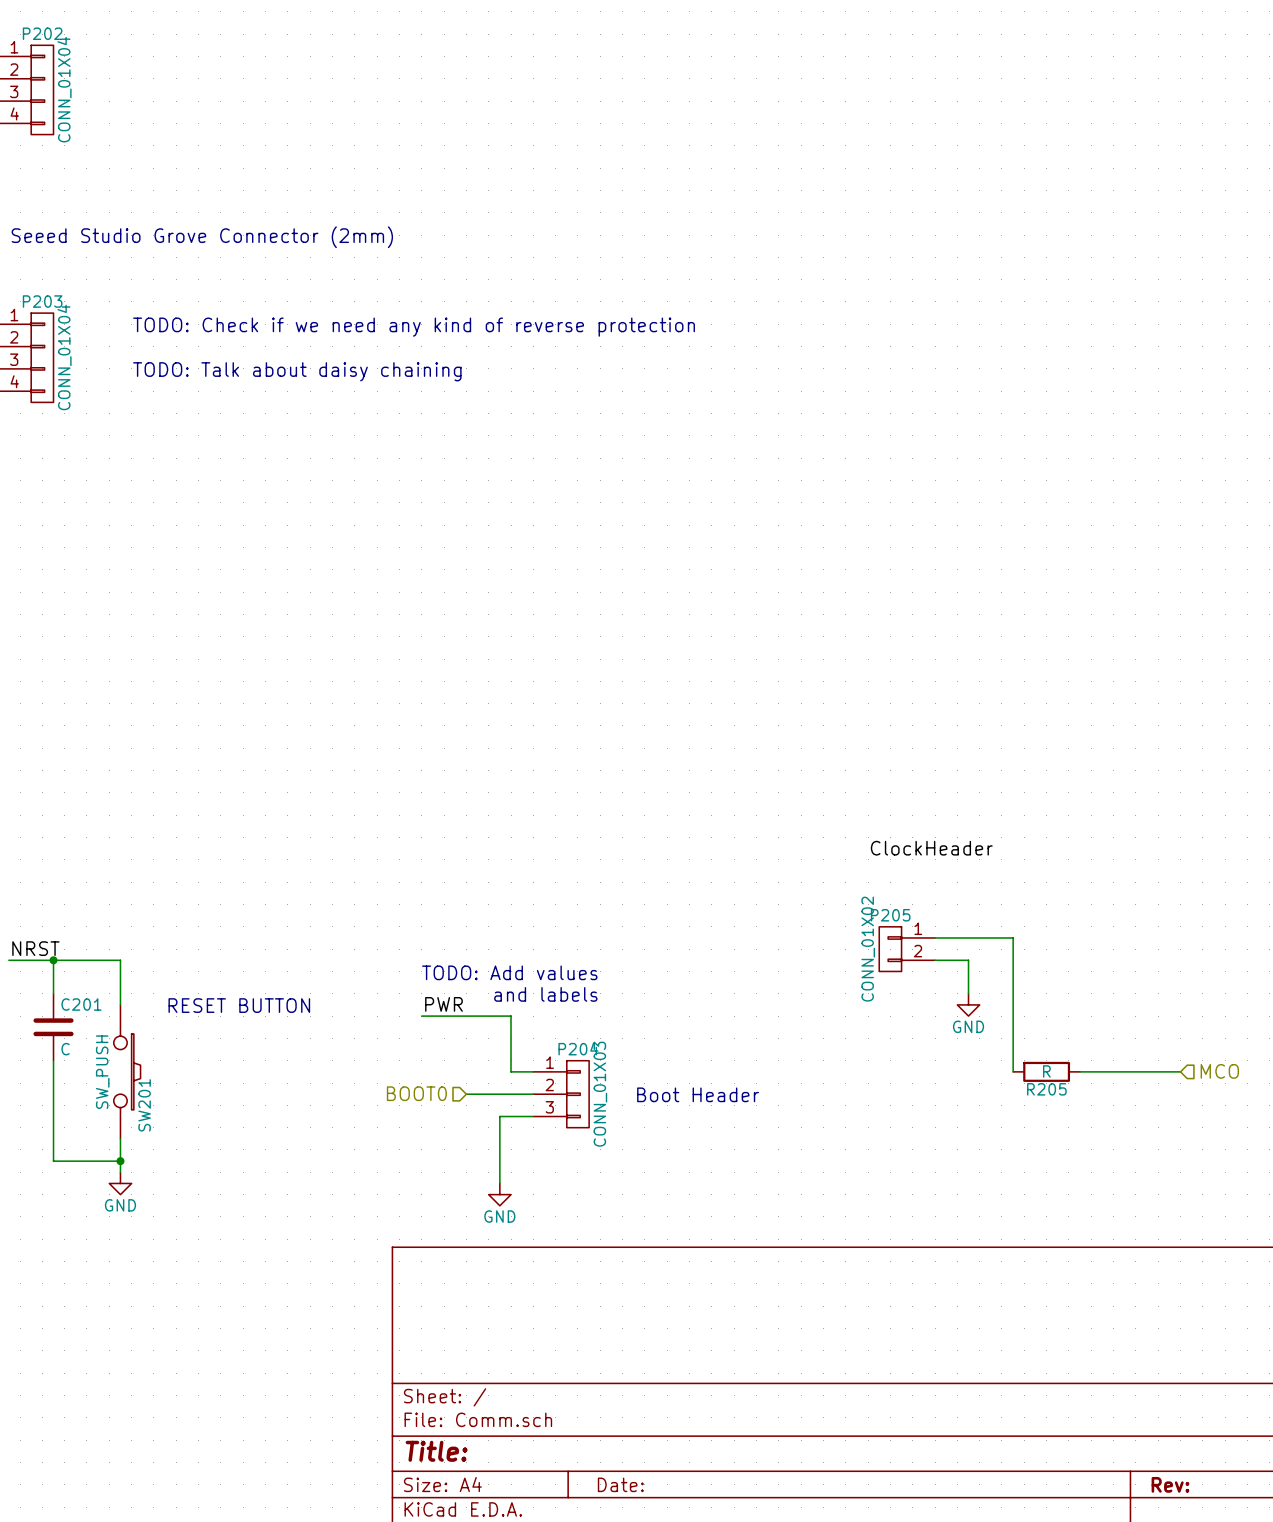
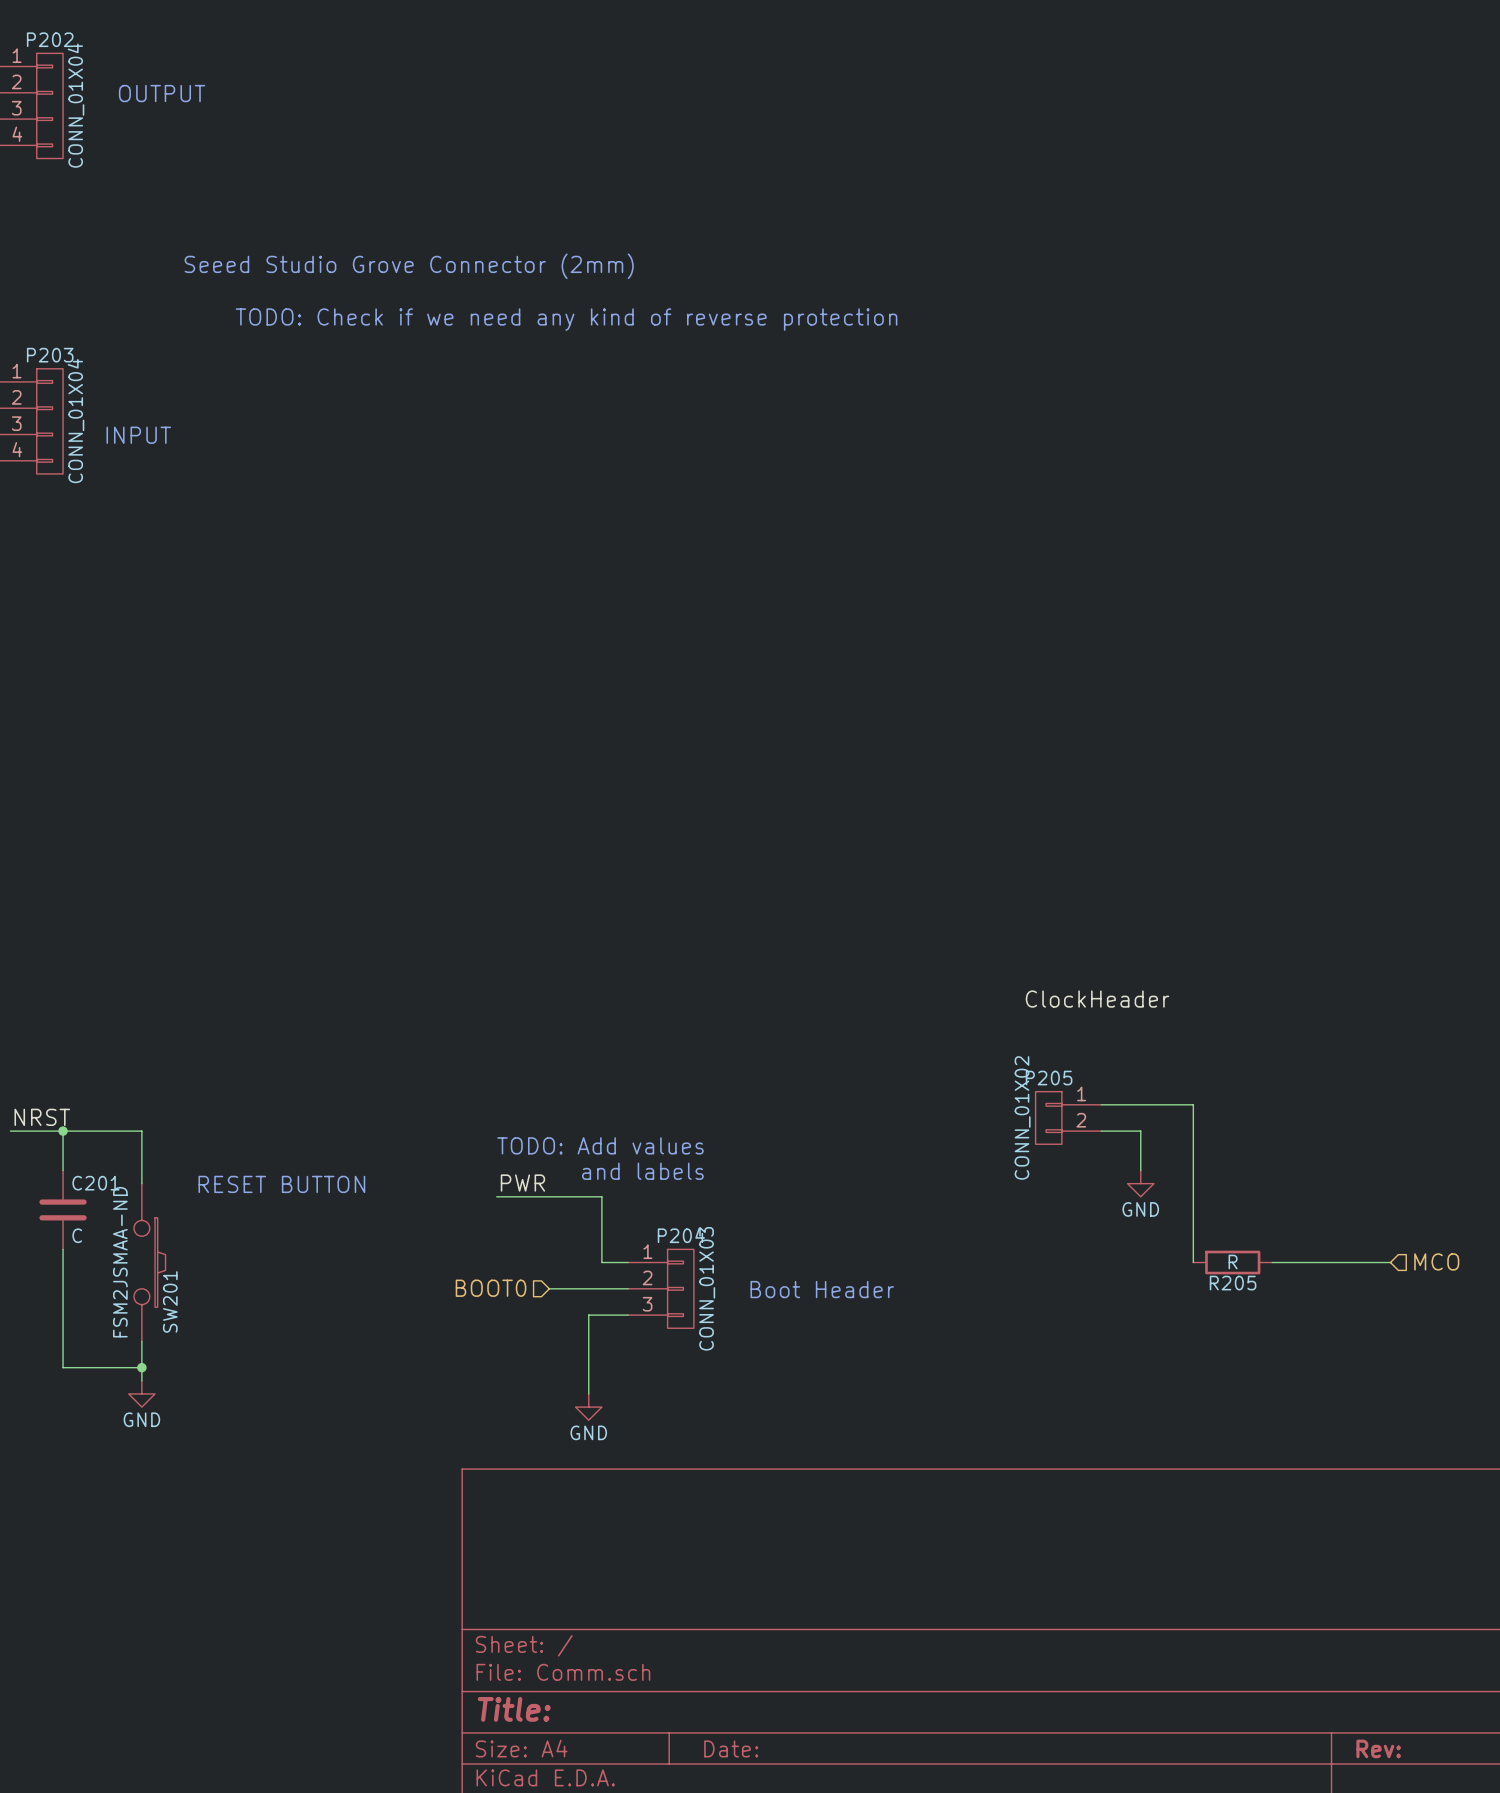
text: none -> OUTPUT (162, 93)
text position: Seeed Studio Grove Connector (2mm) (202, 237) -> Seeed Studio Grove Connector (2mm) (409, 266)
text position: TODO: Check if we need any kind of reverse protection (414, 327) -> TODO: Check if we need any kind of reverse protection (566, 319)
text: none -> INPUT (138, 435)
text: TODO: Talk about daisy chaining (297, 371) -> none
SW201 value: SW_PUSH (102, 1072) -> FSM2JSMAA-ND (120, 1262)

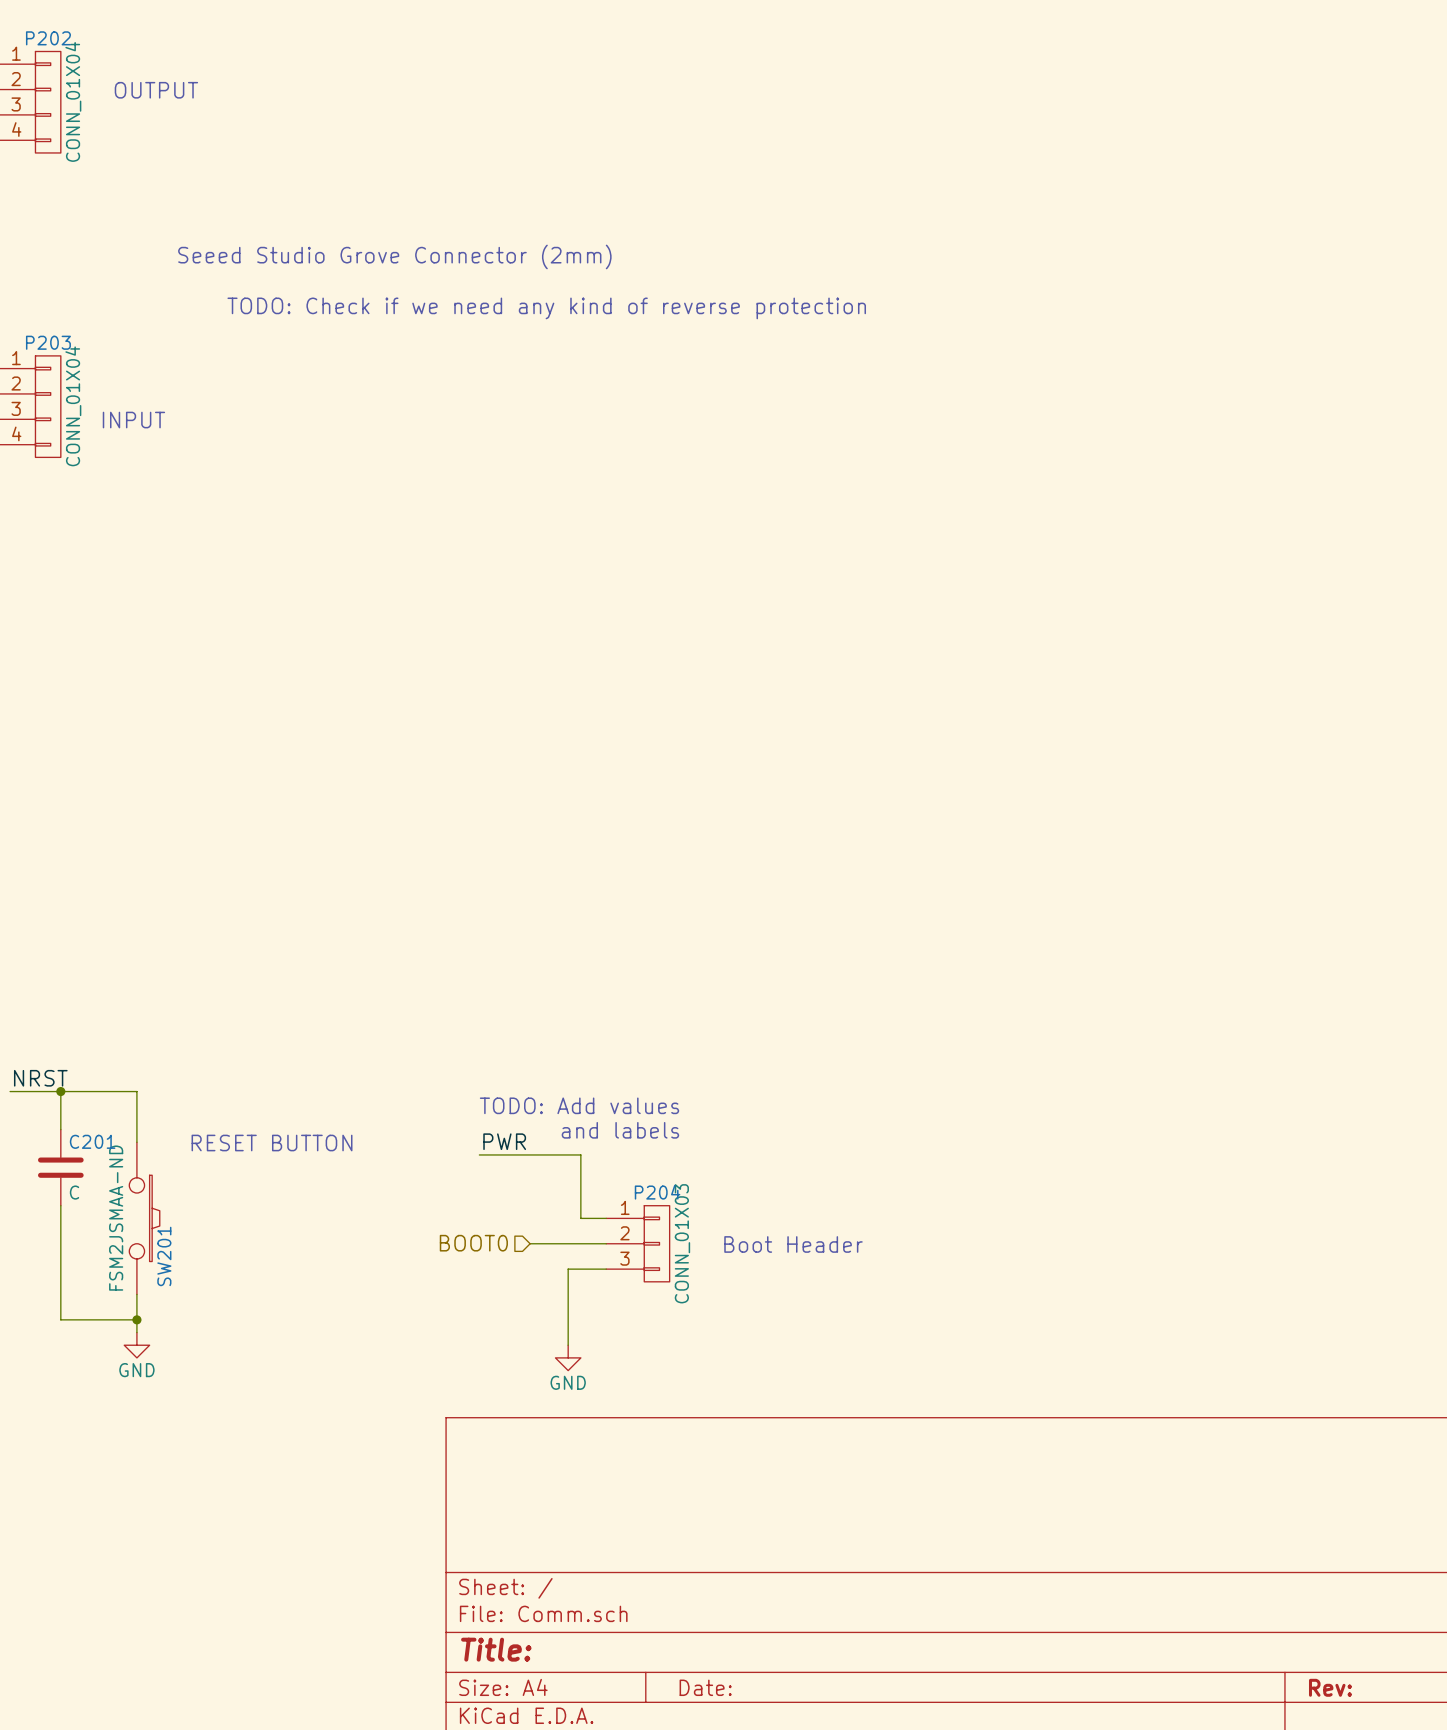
label: ClockHeader (1097, 999) -> none
wire: (1101, 1104) (1193, 1104) (1193, 1262) -> none
P205: CONN_01X02 (1068, 1117) -> none
wire: (1101, 1131) (1140, 1131) (1140, 1170) -> none
power symbol: GND (1140, 1183) -> none
hierarchical label: MCO (1436, 1261) -> none
R205: R (1232, 1262) -> none
wire: (1272, 1262) (1390, 1262) -> none

